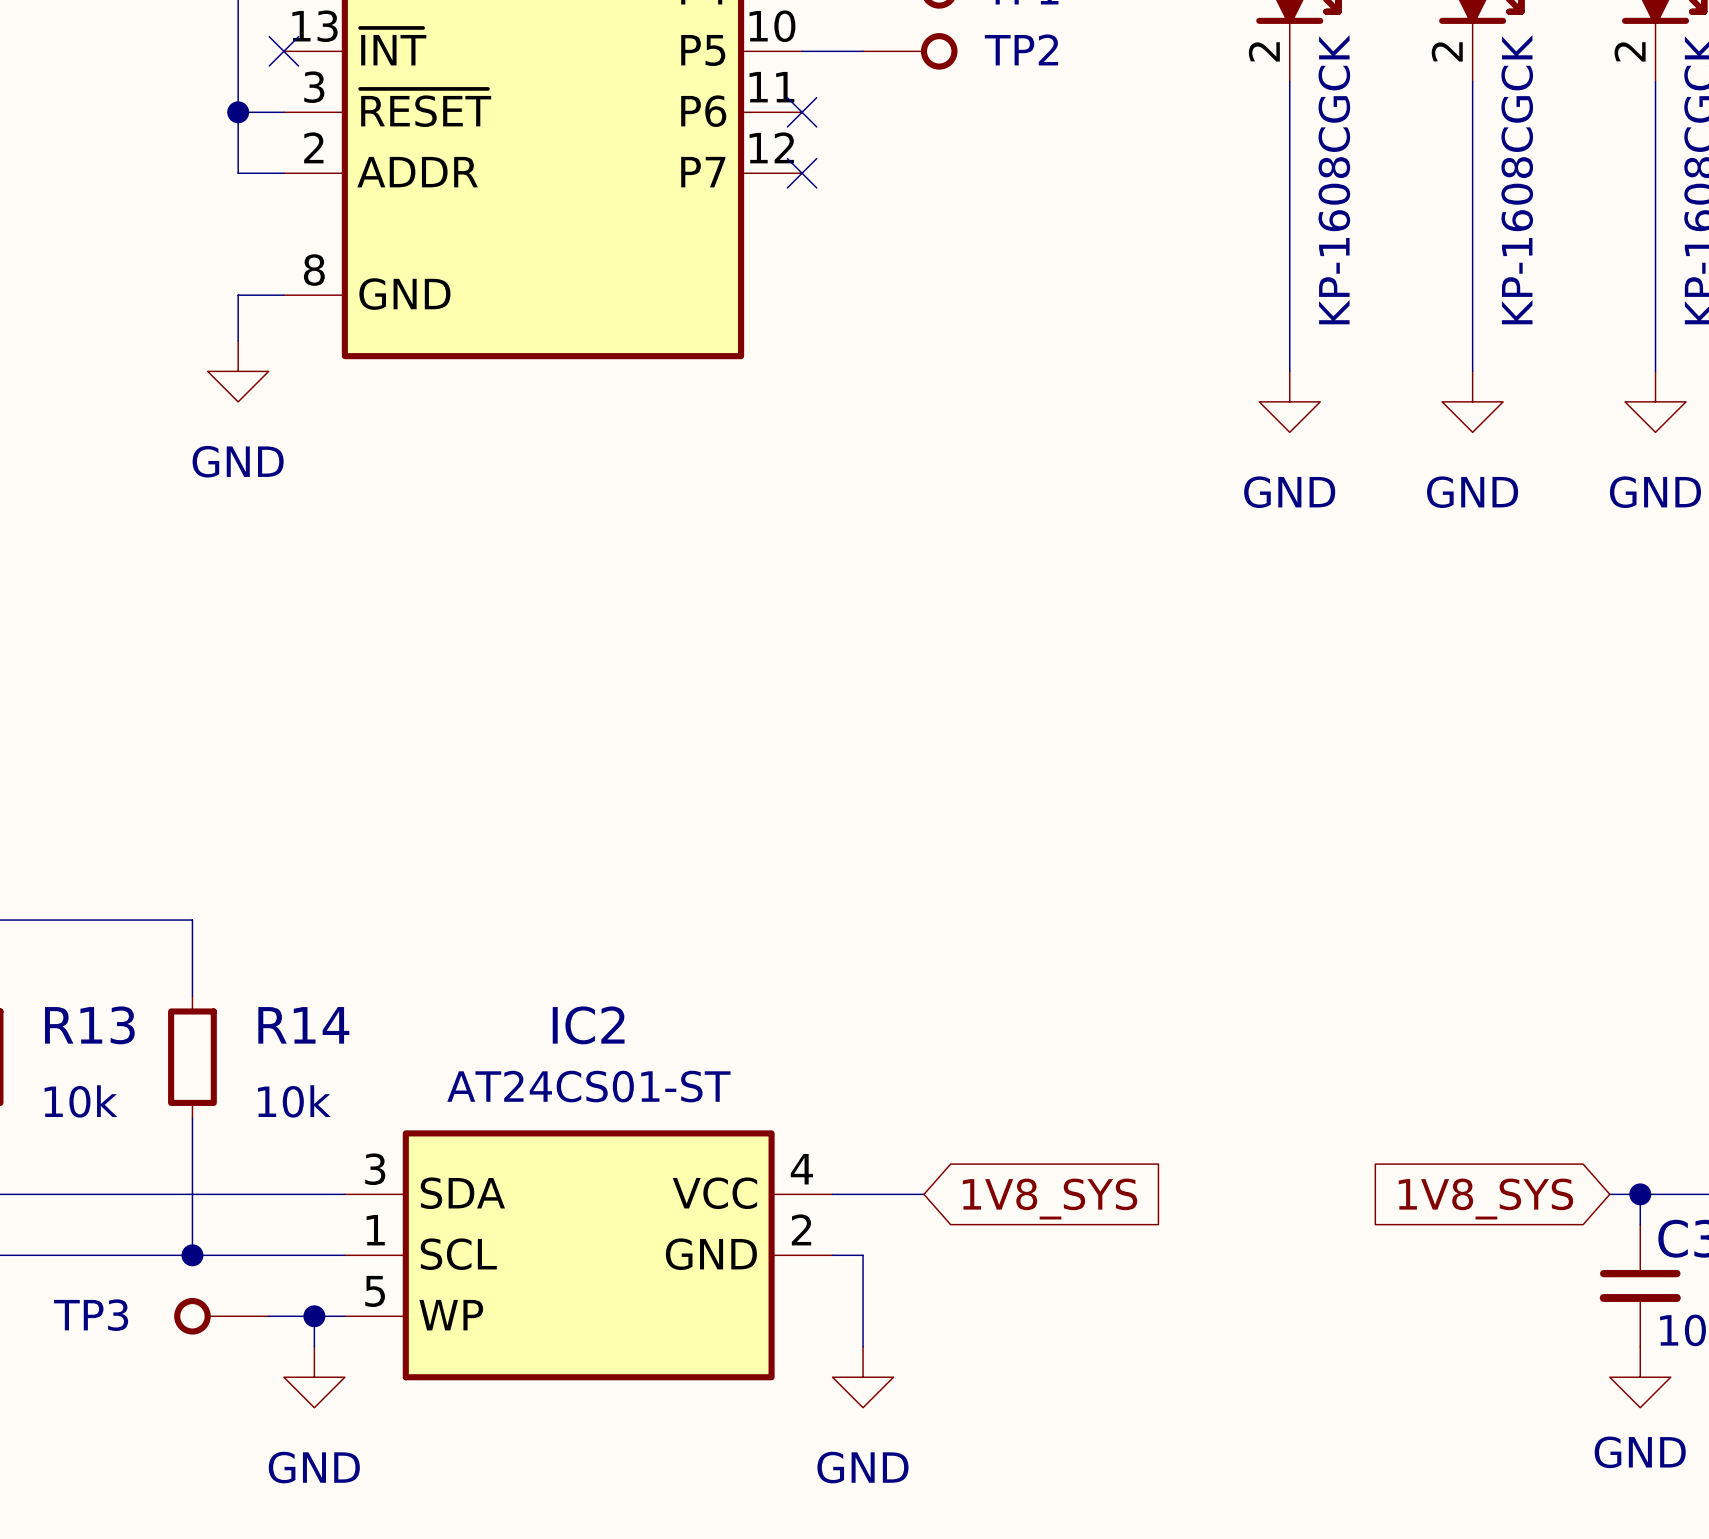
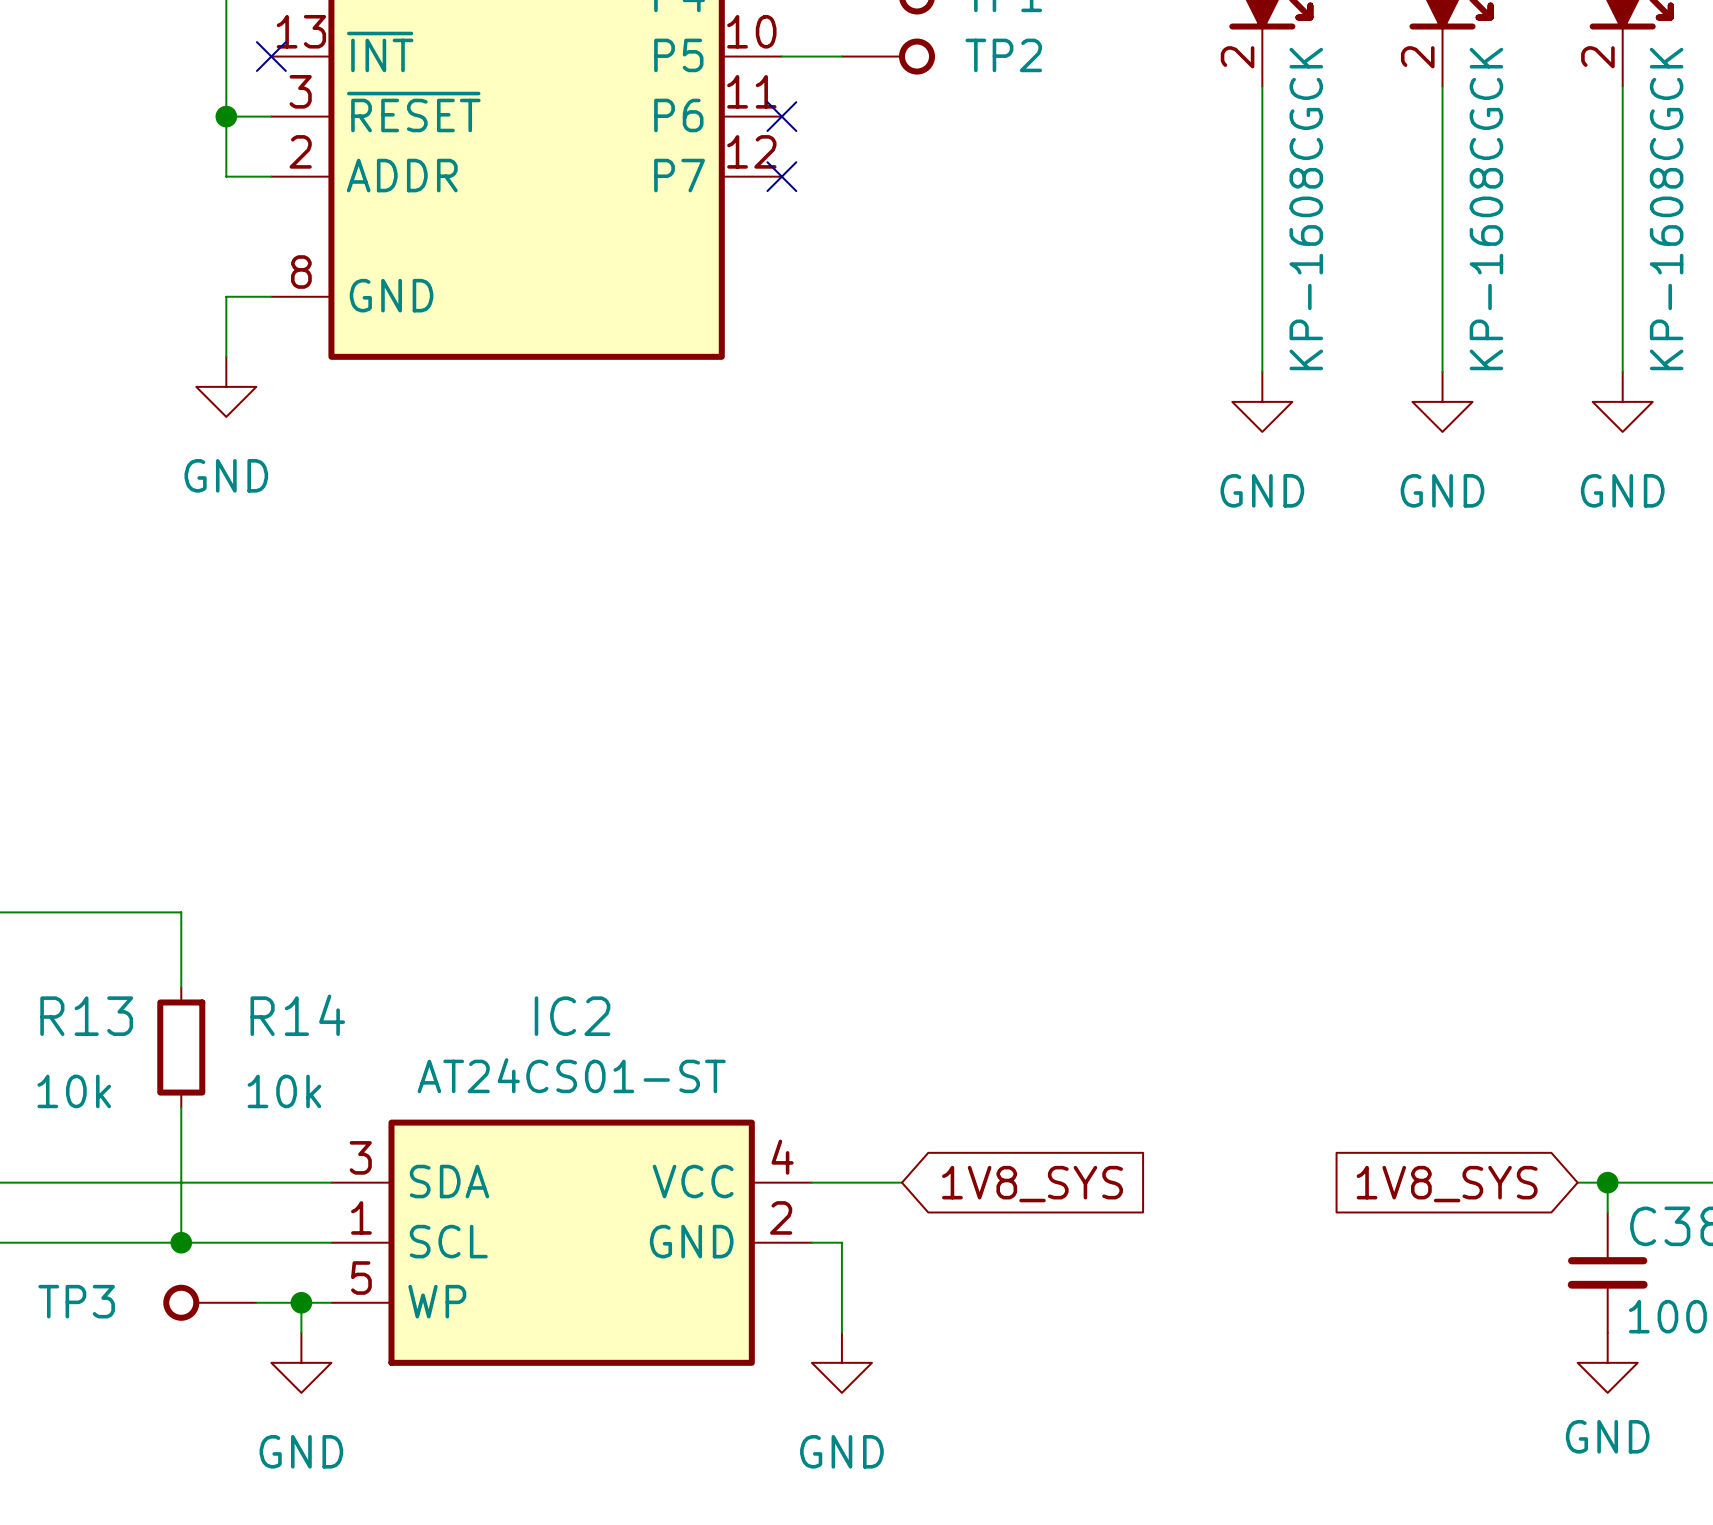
power symbol position: GND (238, 371) -> GND (226, 386)

